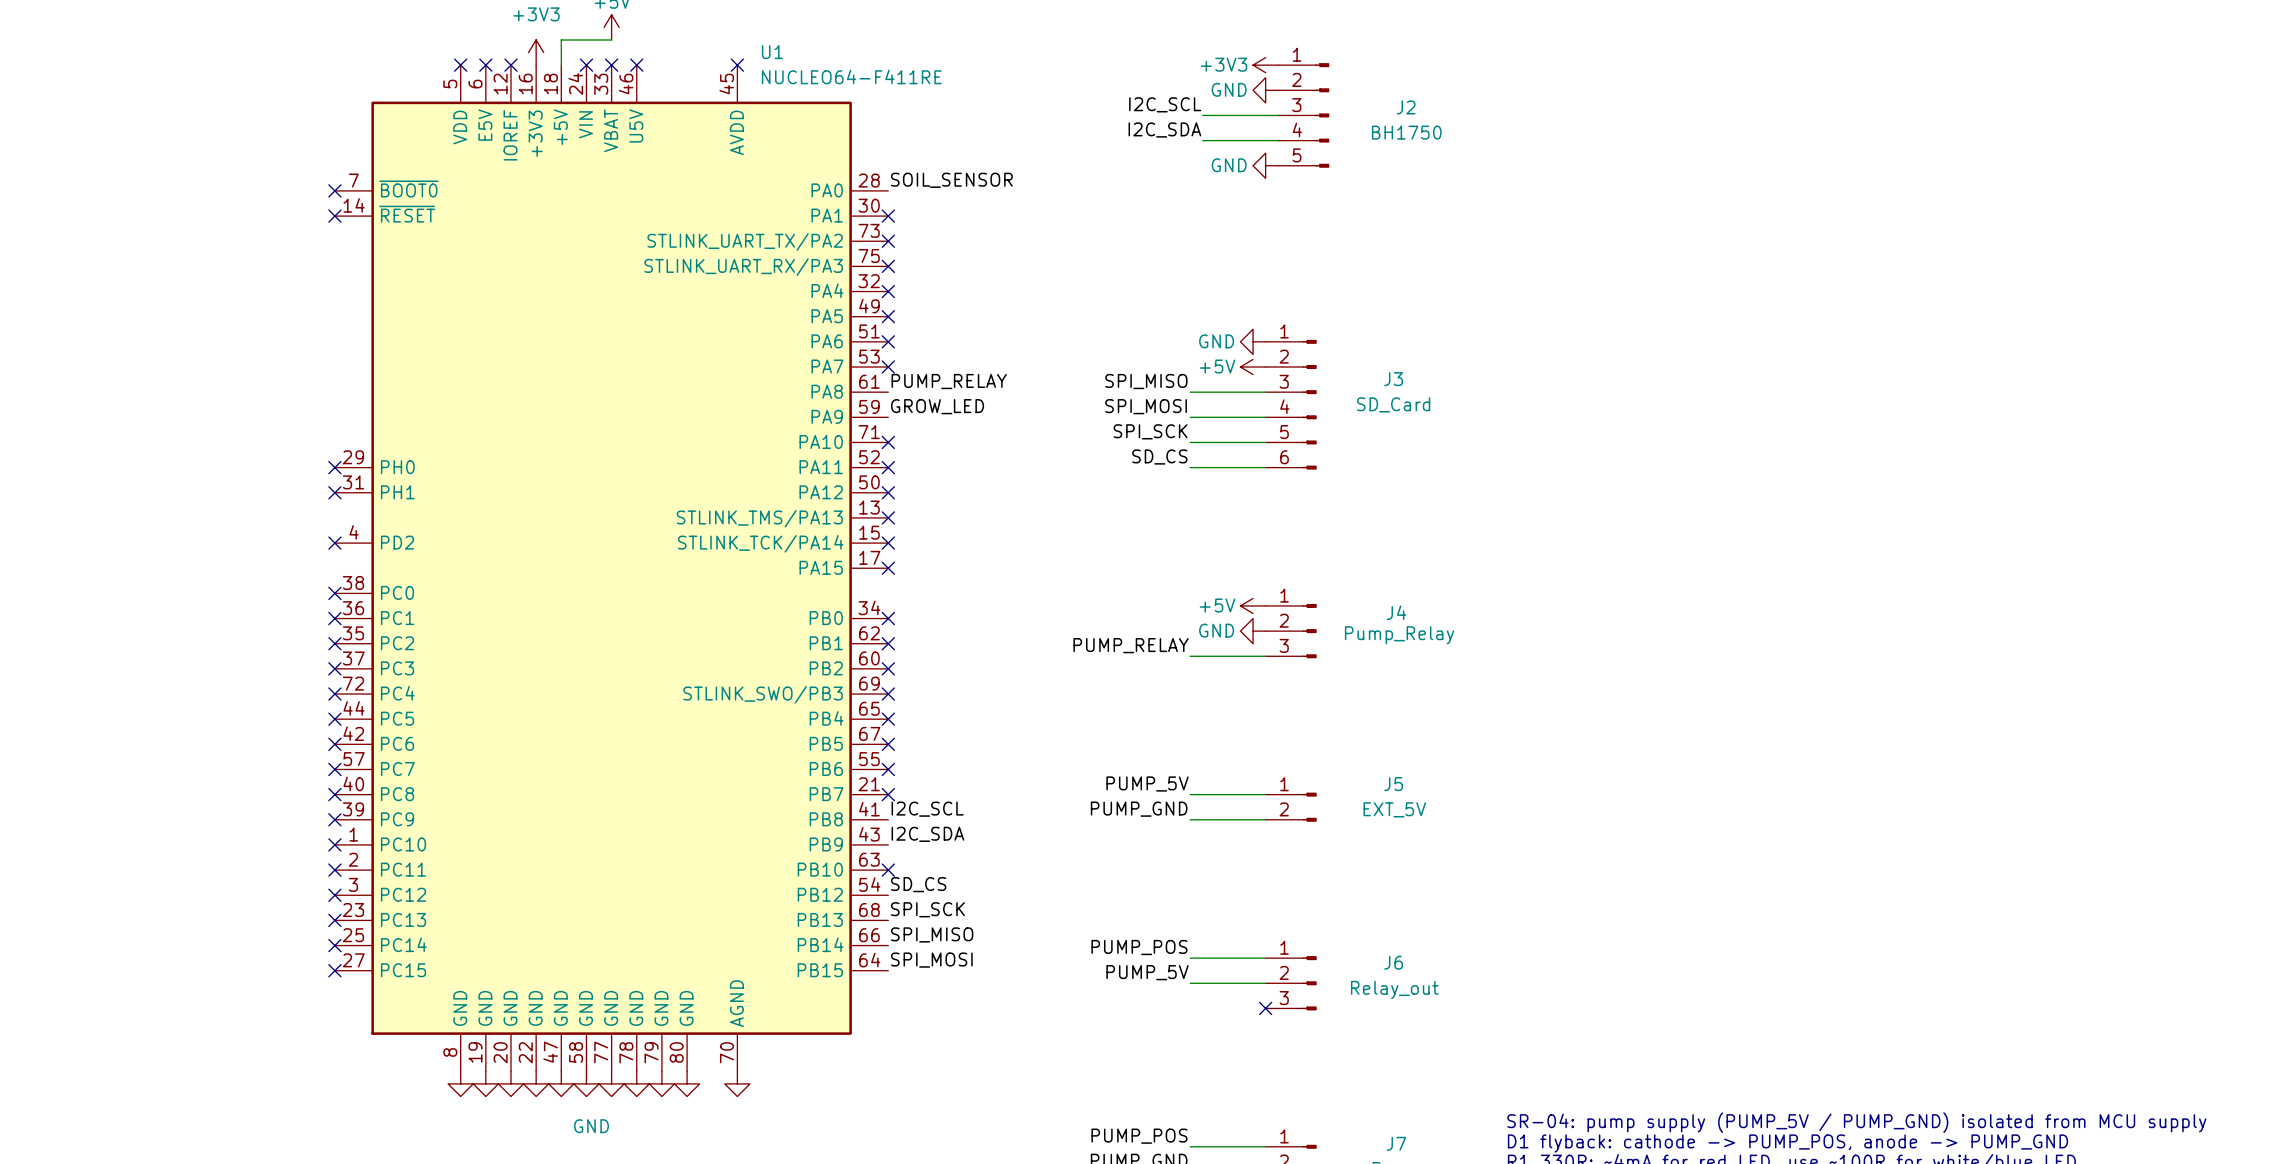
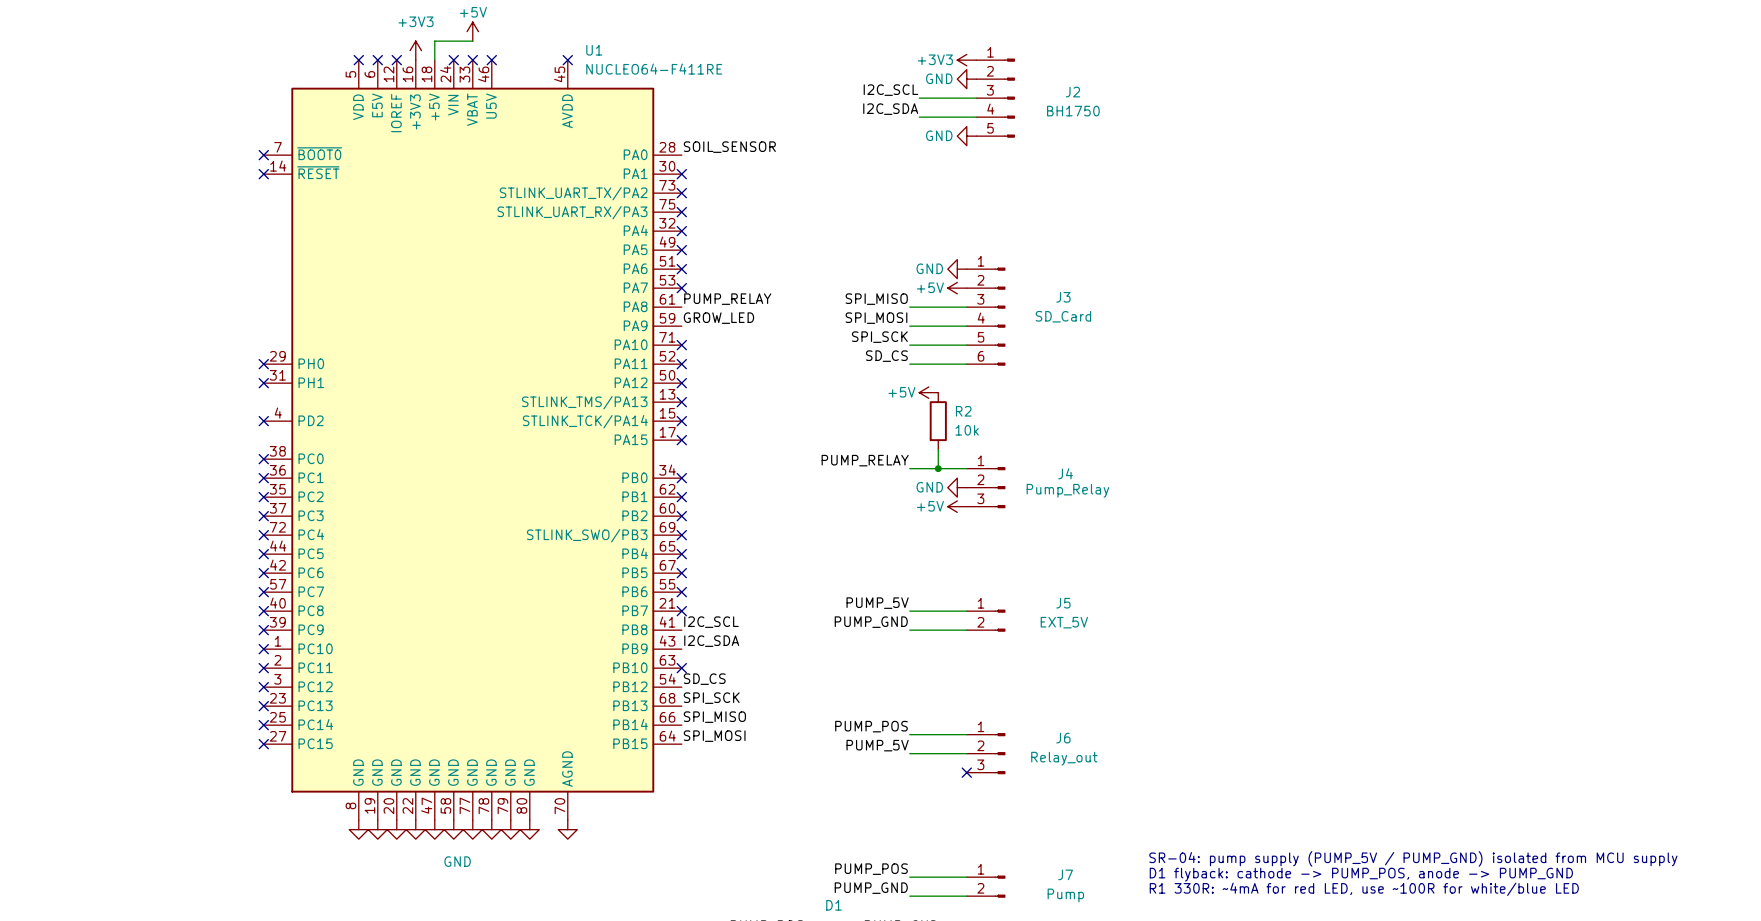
power symbol: none -> +5V (928, 392)
R2: none -> 10k (938, 421)
wire: none -> (938, 449) (938, 468)
junction: none -> (938, 468)
power symbol position: +5V (1253, 605) -> +5V (957, 506)
label position: PUMP_RELAY (1131, 645) -> PUMP_RELAY (865, 460)
wire: (1190, 656) (1265, 656) -> (909, 468) (966, 468)

